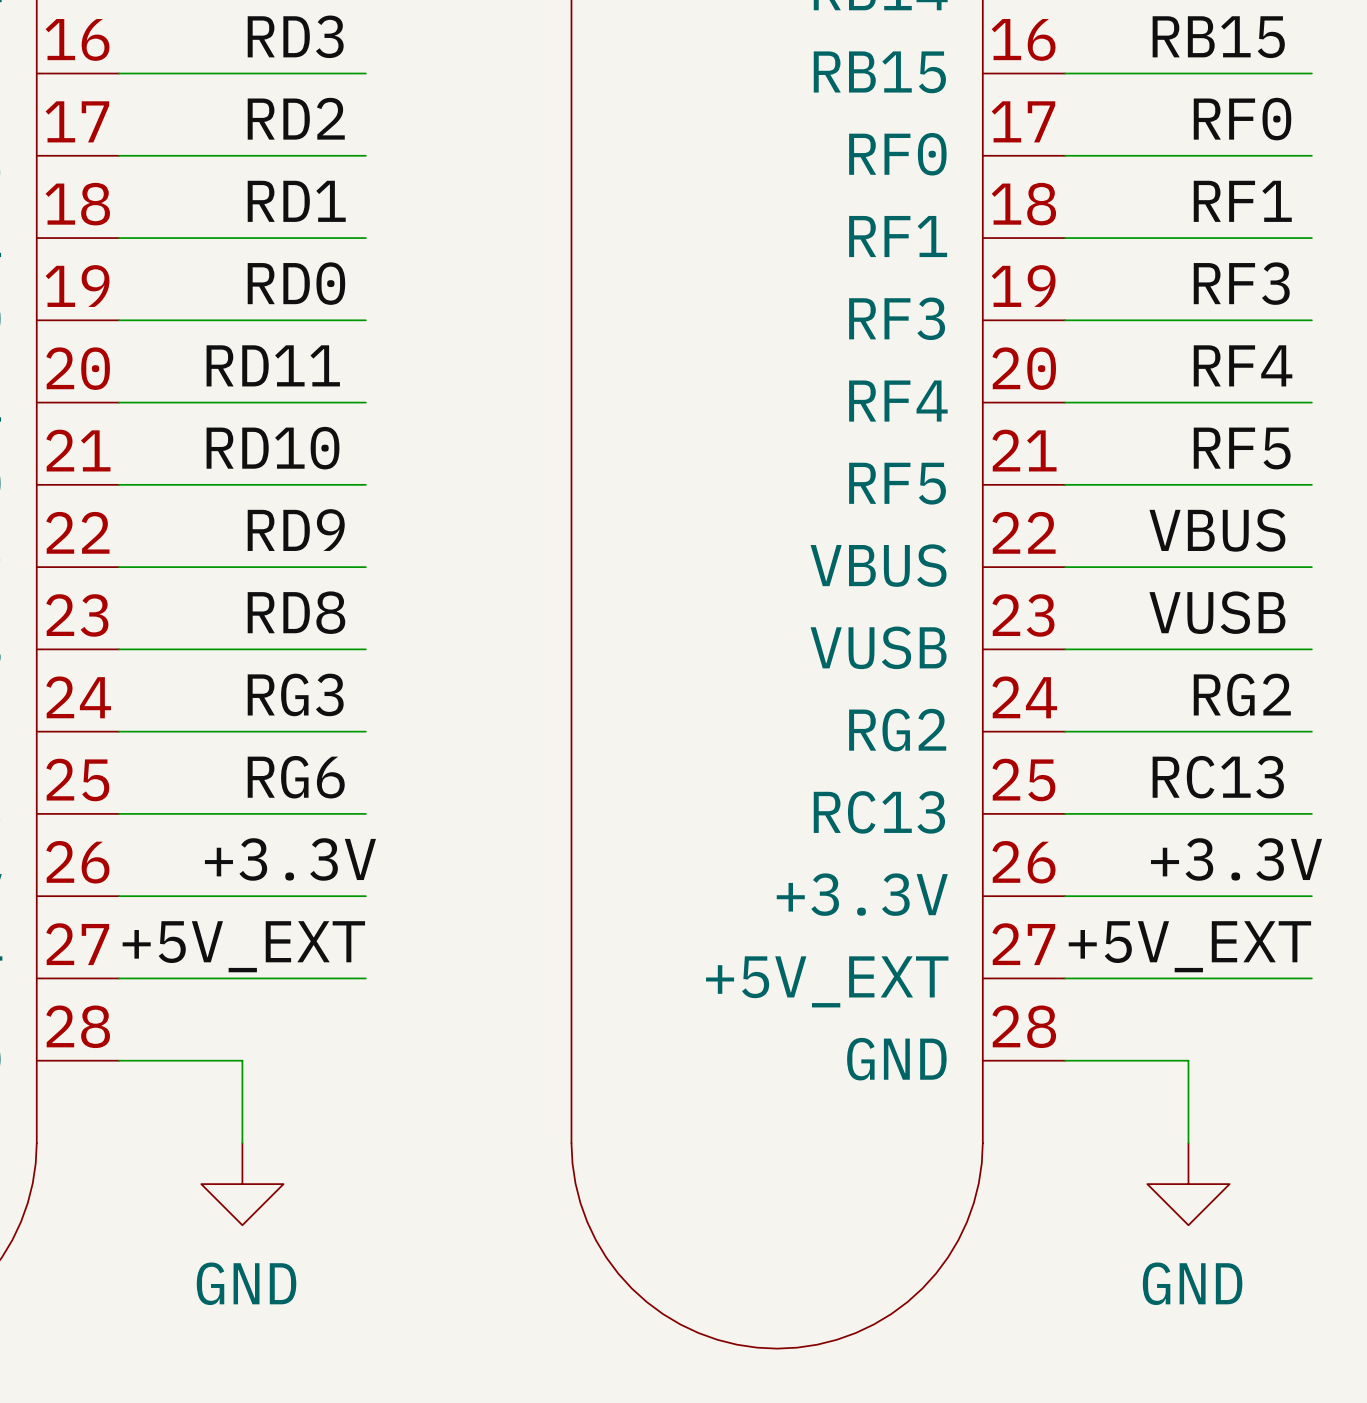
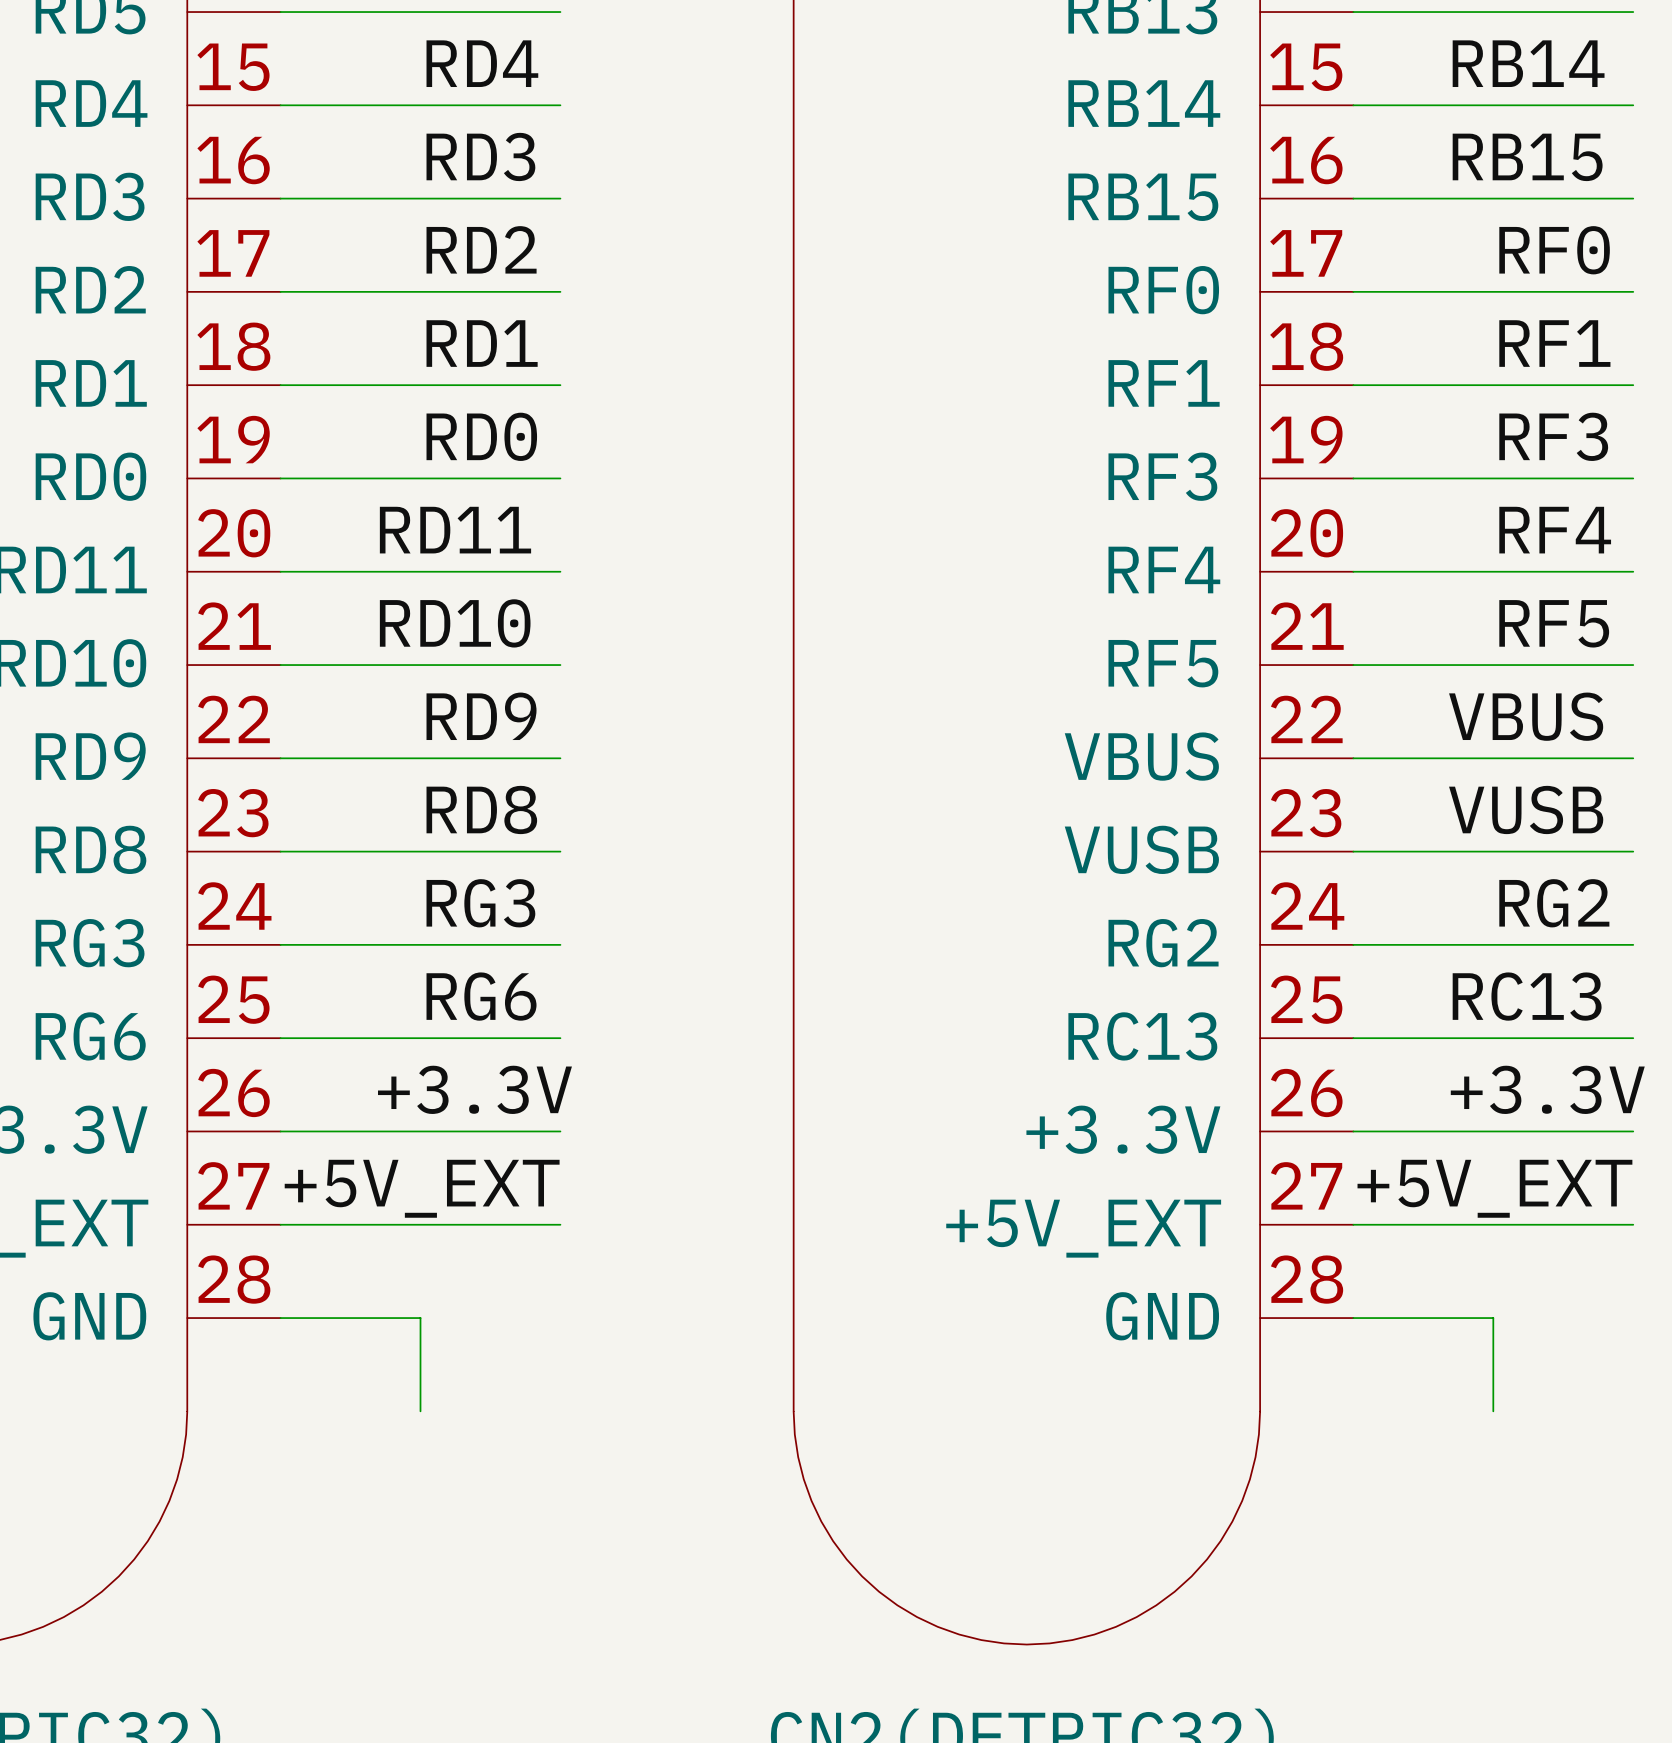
power symbol: GND (242, 1184) -> none
power symbol: GND (1188, 1184) -> none

